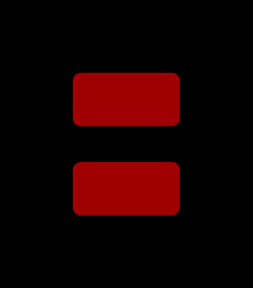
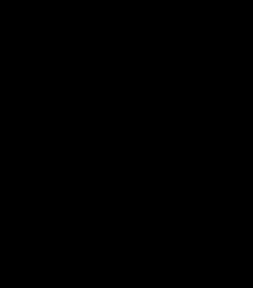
part: (126, 144) -> none

